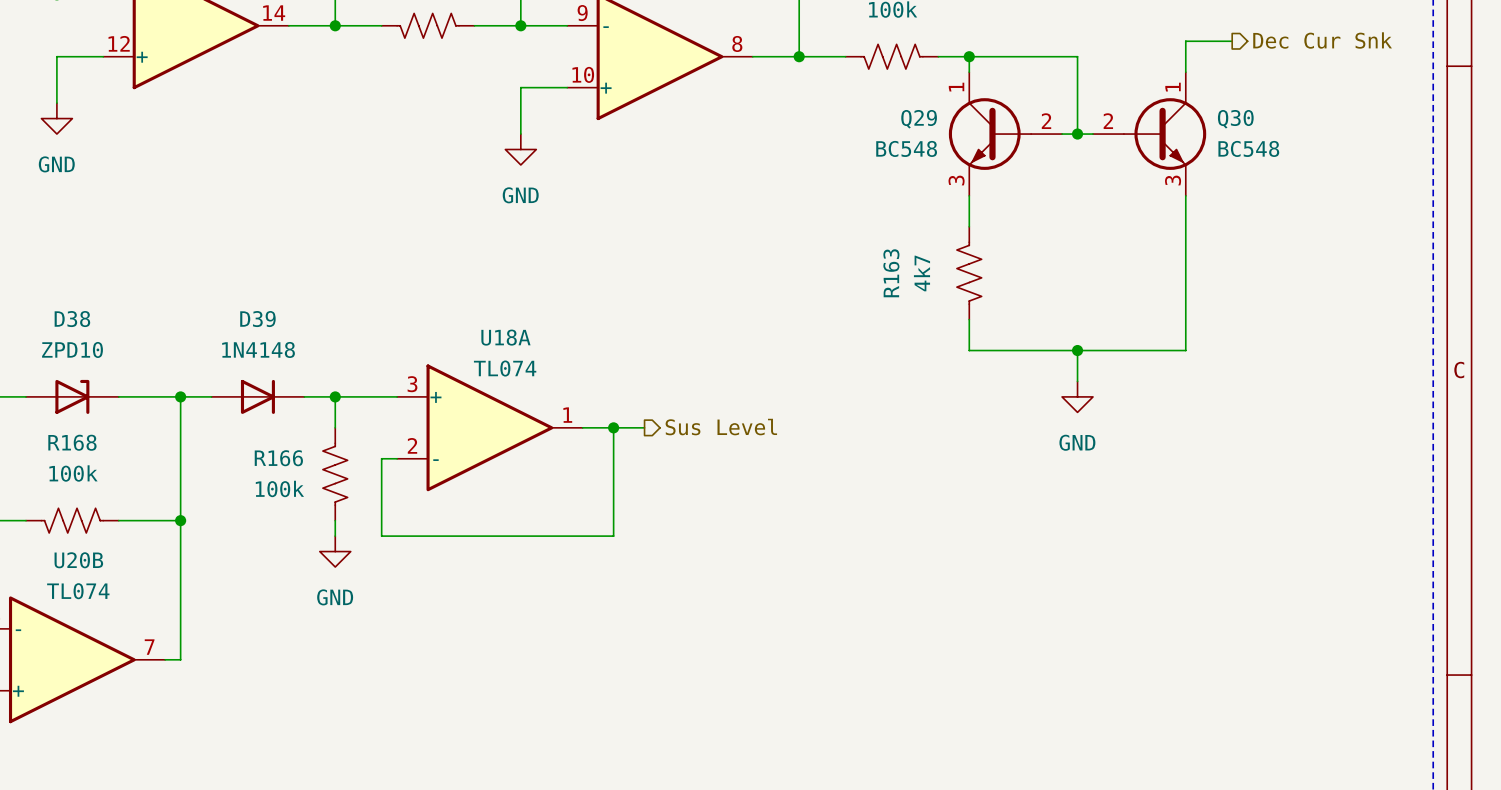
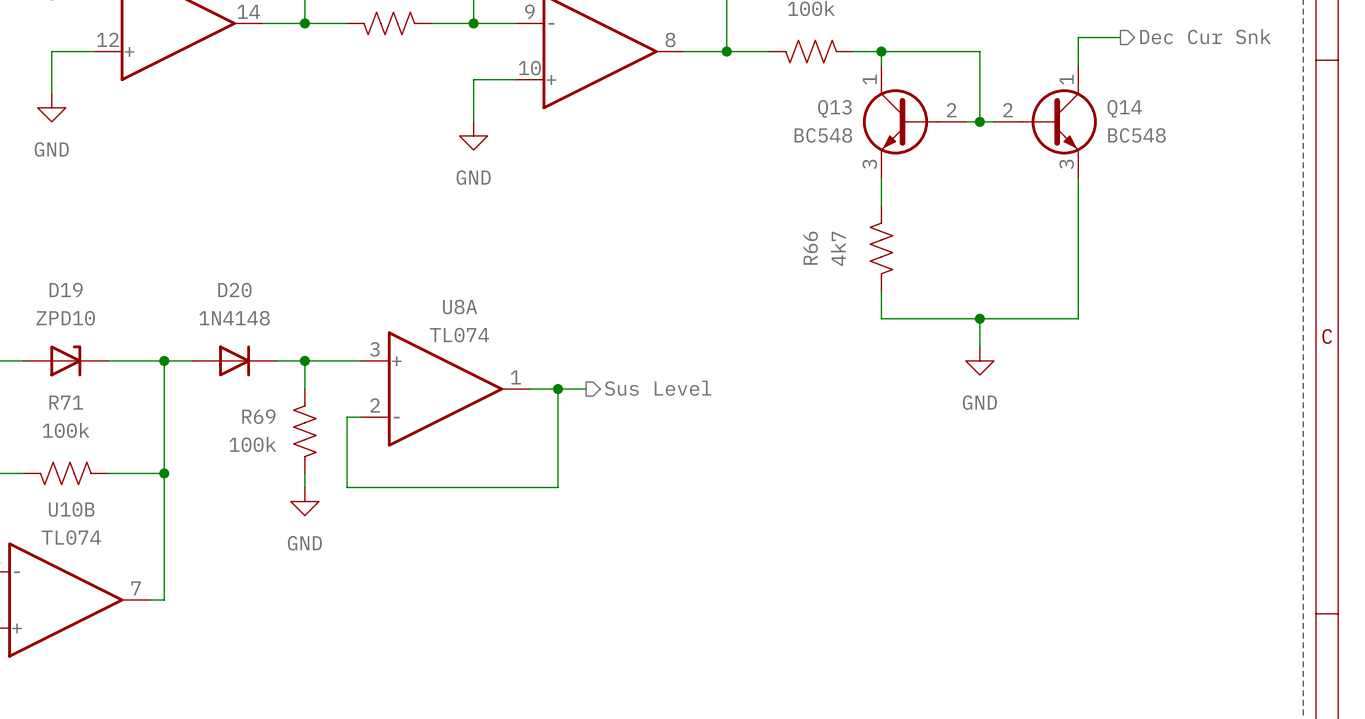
Q29 name: Q29 (919, 119) -> Q13 (834, 108)
Q30 name: Q30 (1235, 119) -> Q14 (1124, 108)
R163 name: R163 (891, 273) -> R66 (810, 248)
D38 name: D38 (72, 319) -> D19 (66, 289)
D39 name: D39 (257, 319) -> D20 (234, 290)
U18A name: U18A (505, 337) -> U8A (460, 306)
R168 name: R168 (72, 442) -> R71 (66, 402)
R166 name: R166 (278, 458) -> R69 (258, 416)
U20B name: U20B (78, 560) -> U10B (71, 509)

